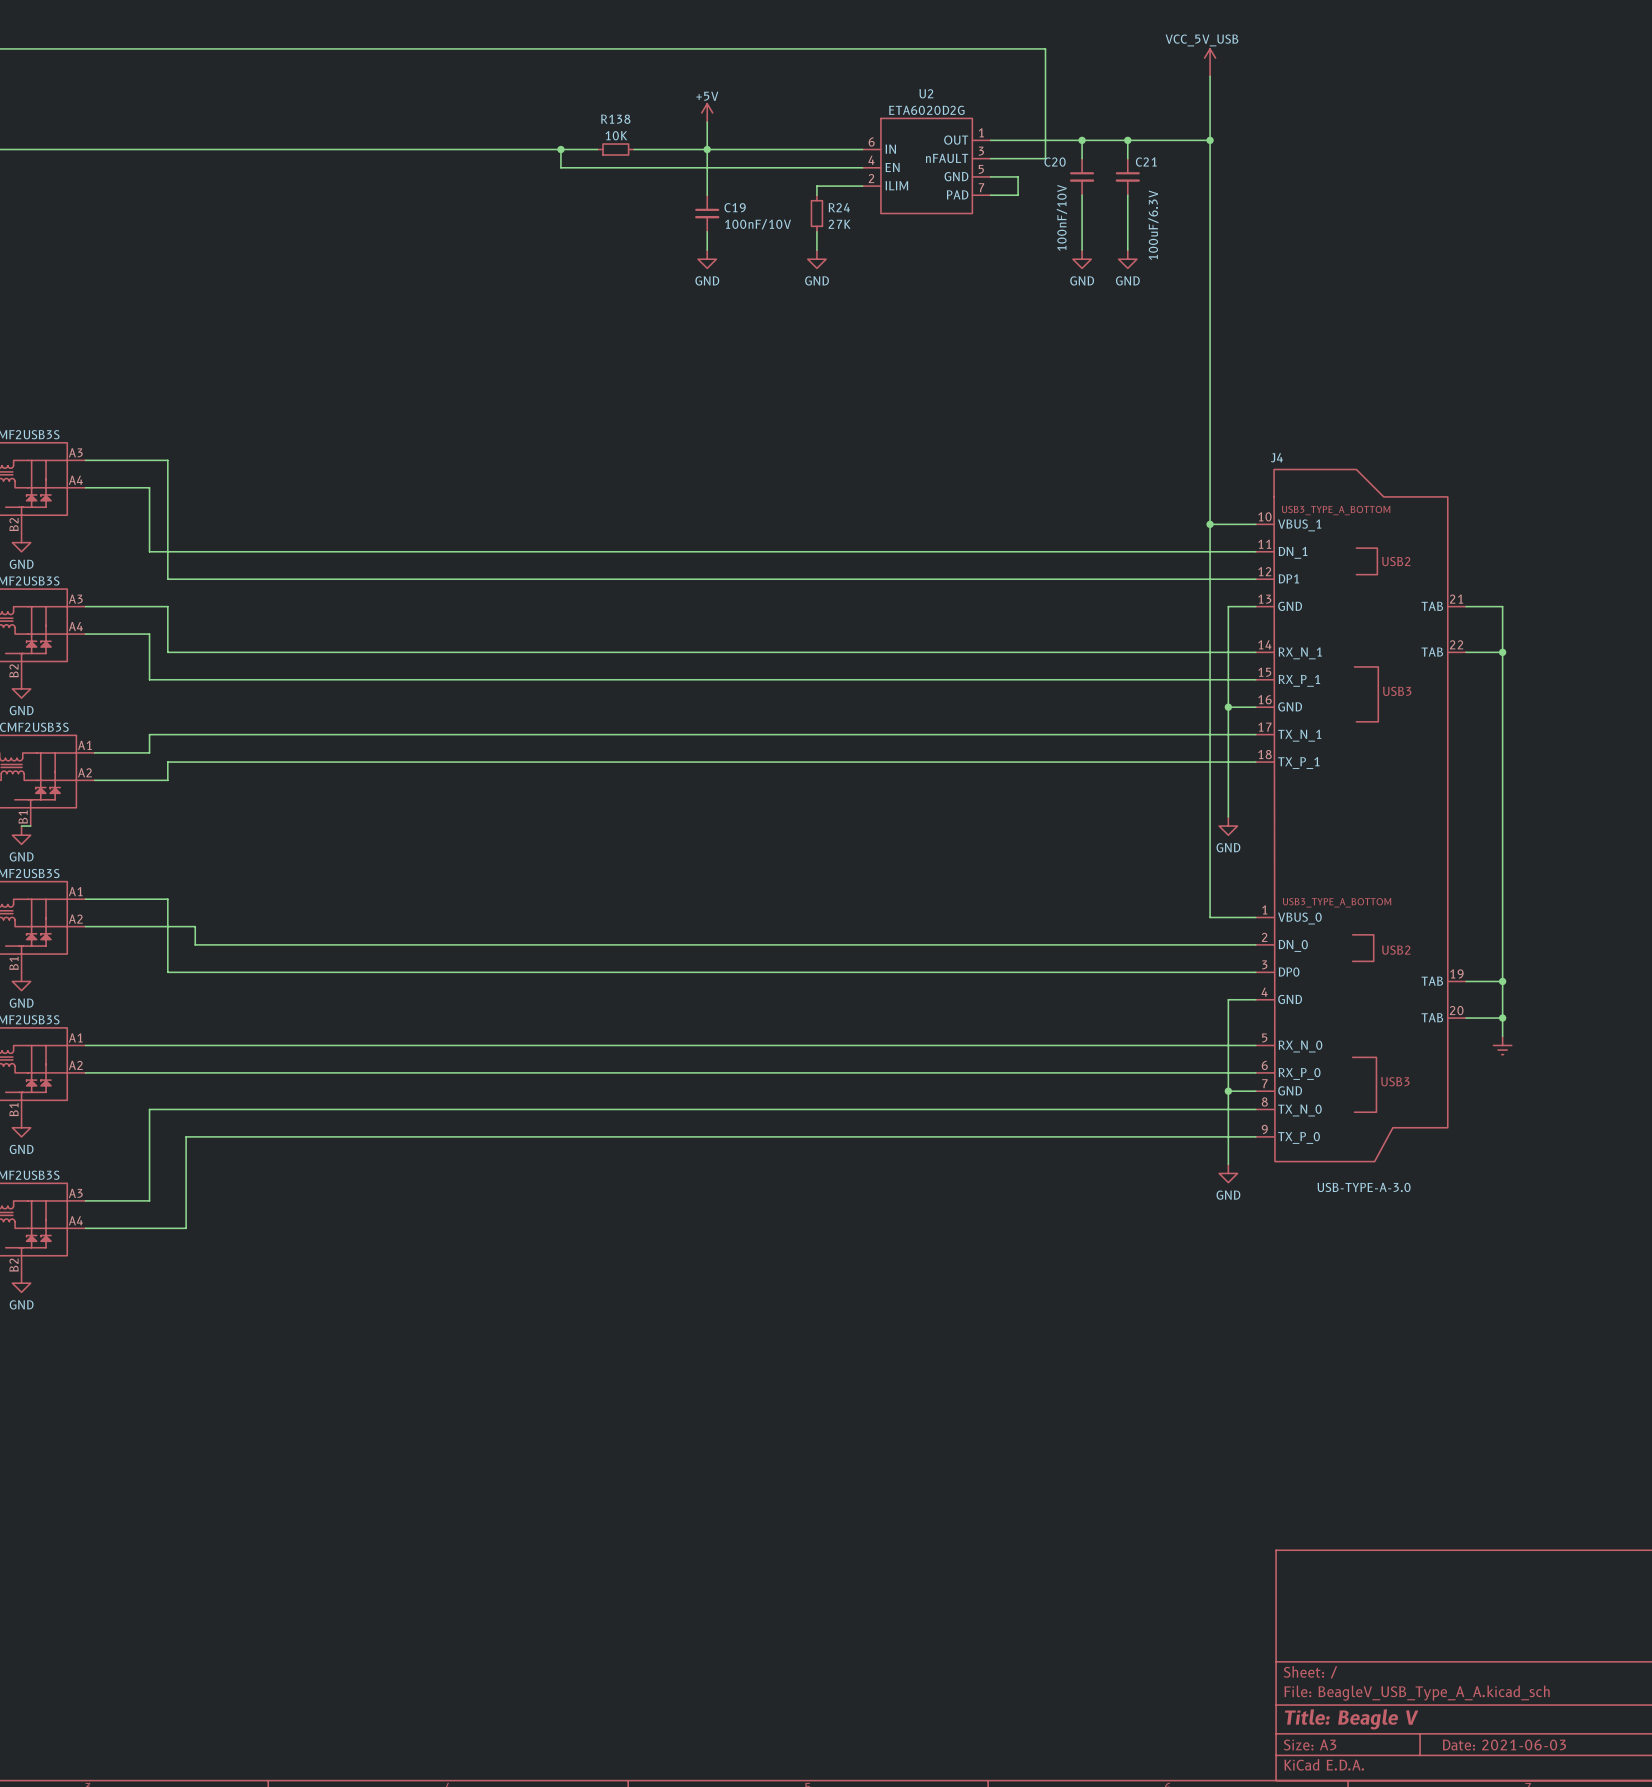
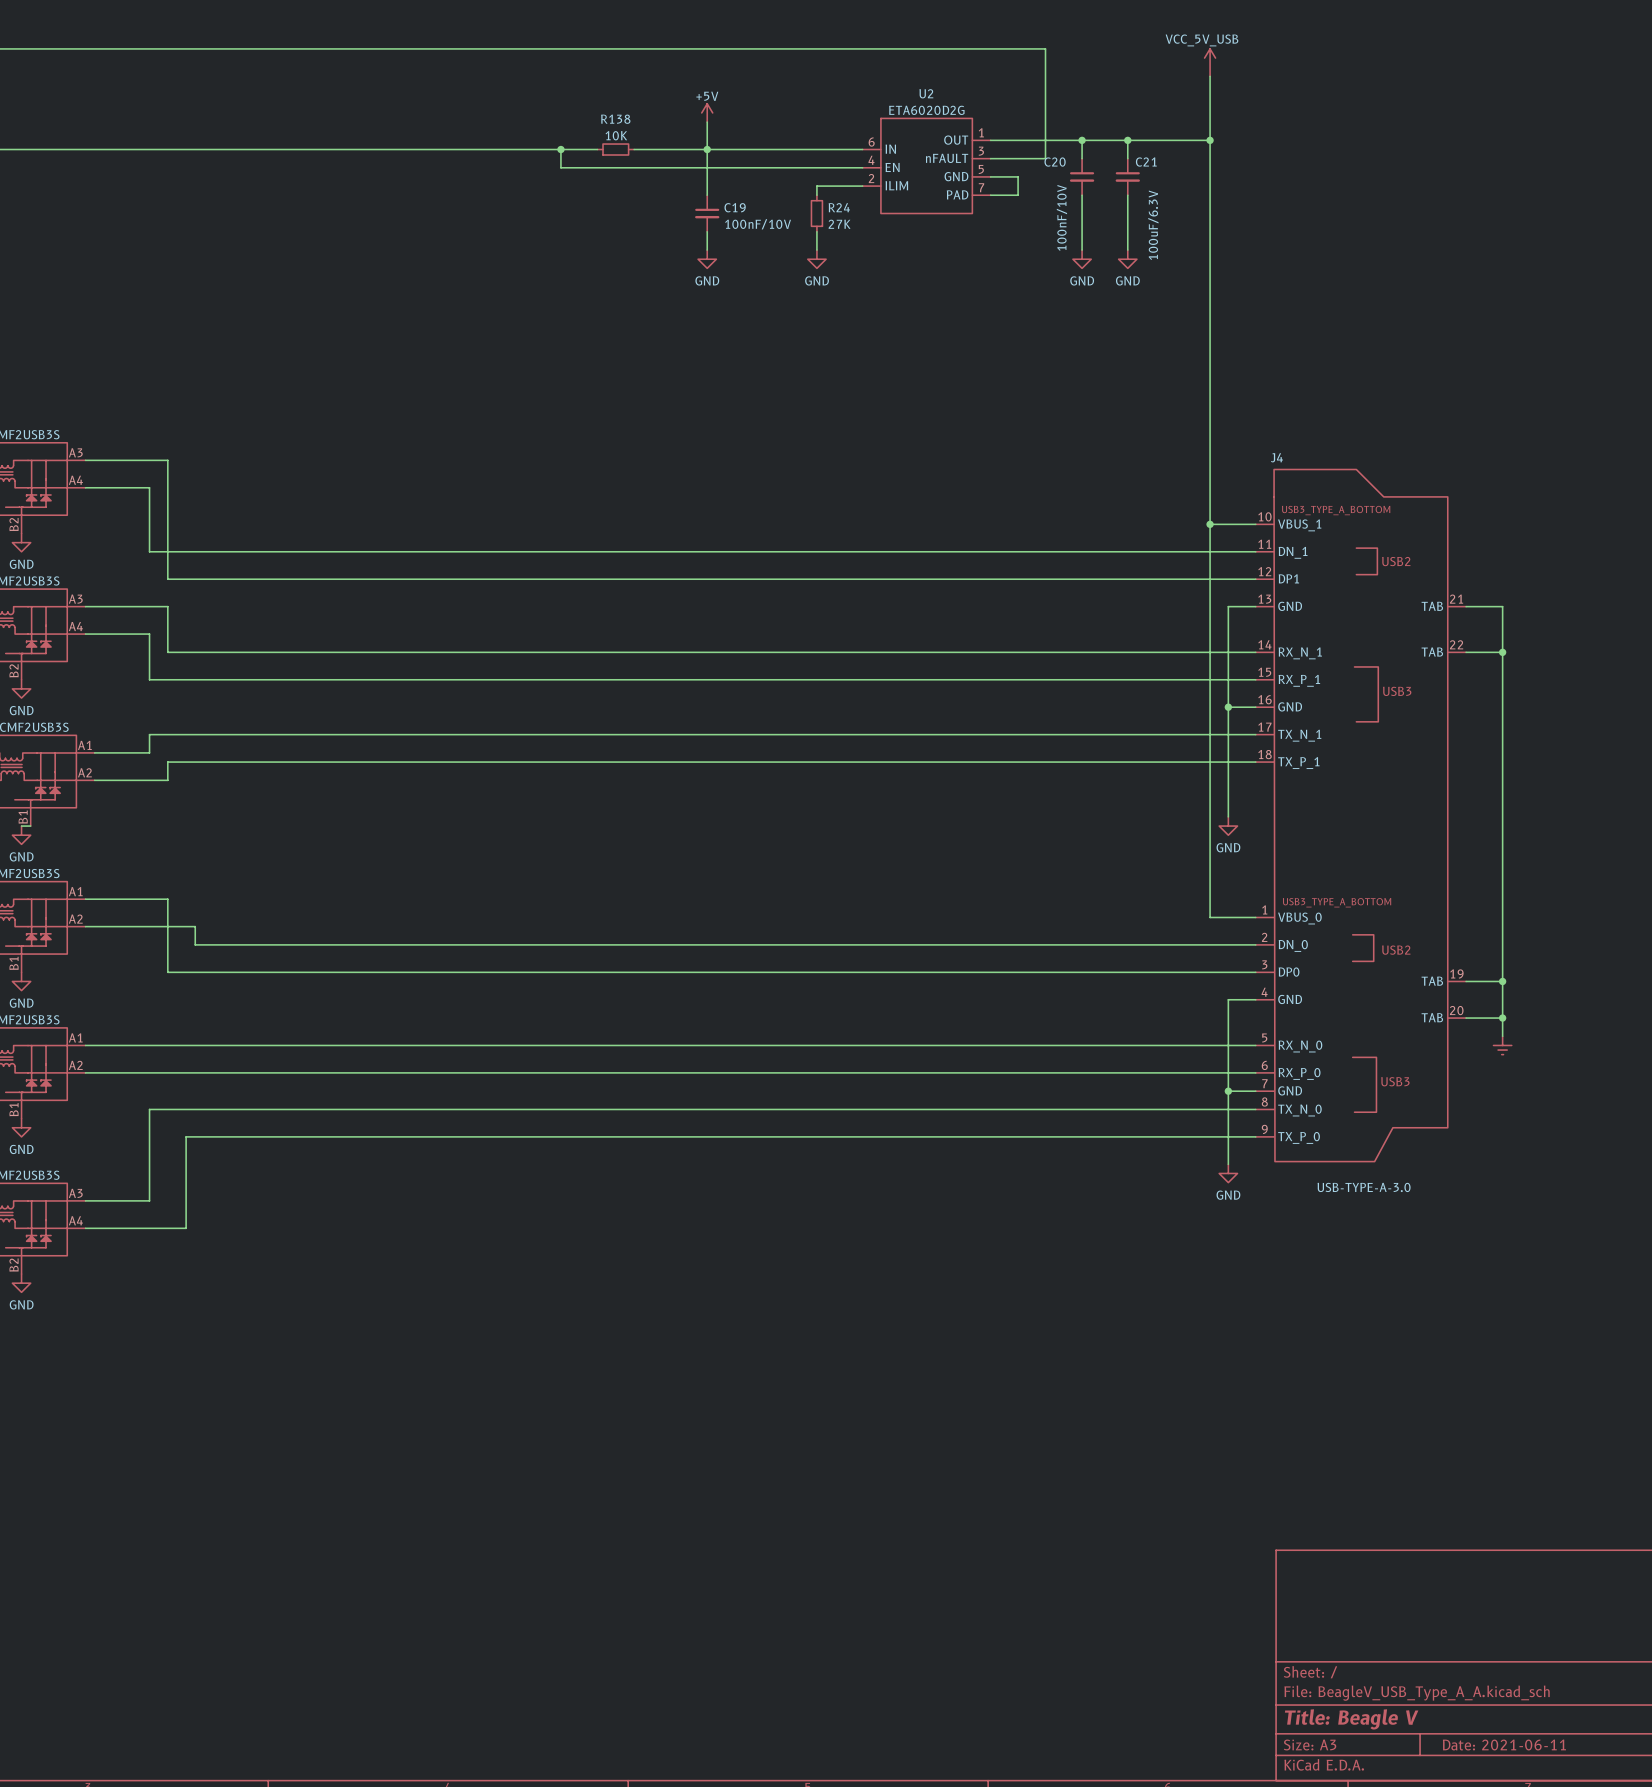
title block: Date: 2021-06-03 (1504, 1745) -> Date: 2021-06-11 (1504, 1745)

